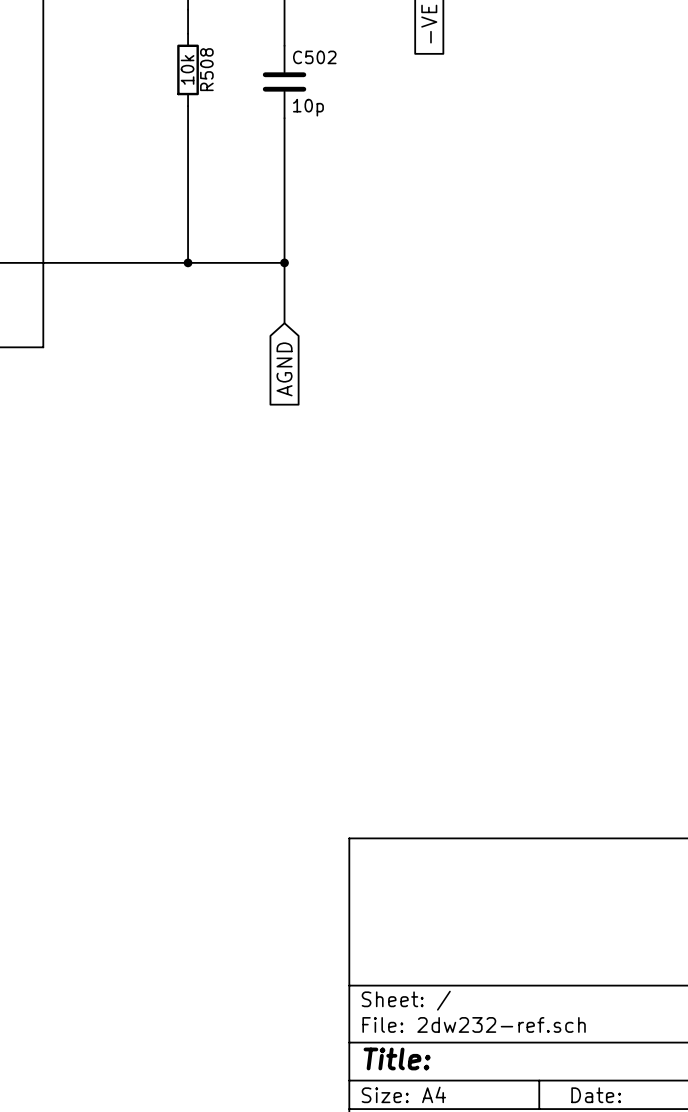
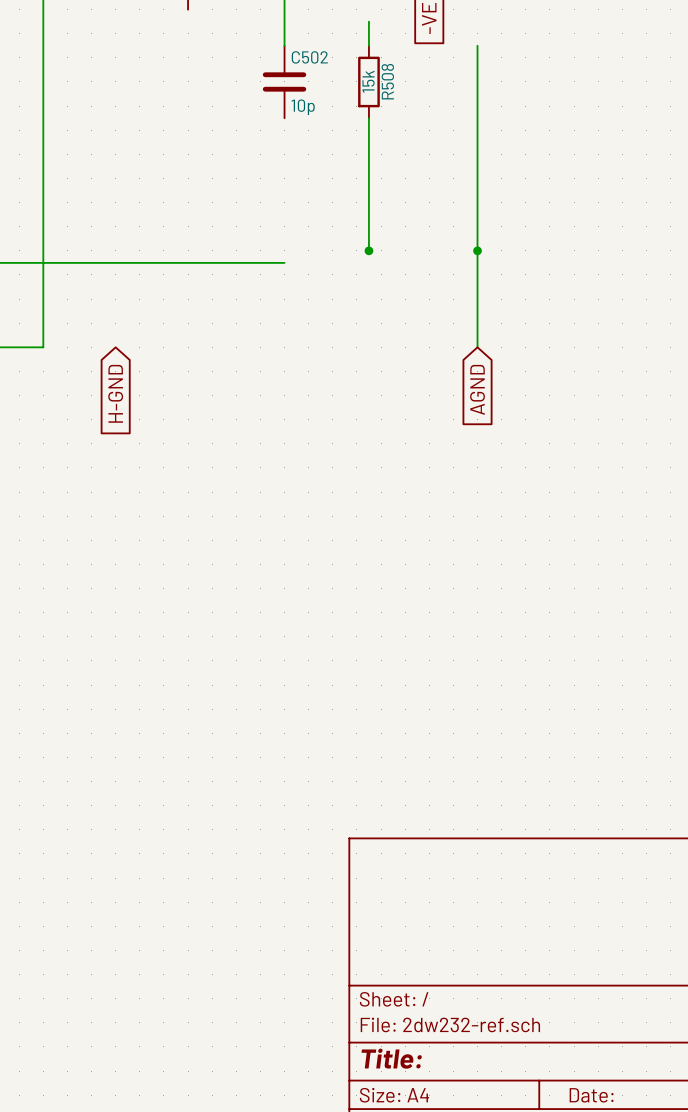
wire: (188, 9) (188, 33) -> (368, 21) (368, 45)
wire: none -> (477, 45) (477, 347)
R508 value: 10k (187, 69) -> 15k (368, 81)
R508 position: (188, 69) -> (368, 81)
wire: (188, 106) (188, 262) -> none
wire: (284, 118) (284, 323) -> none
wire: none -> (368, 118) (368, 250)
junction: none -> (368, 250)
junction: none -> (477, 250)
junction: (188, 262) -> none
junction: (284, 262) -> none
global label position: AGND (284, 369) -> AGND (477, 389)
global label: none -> H-GND (115, 393)

